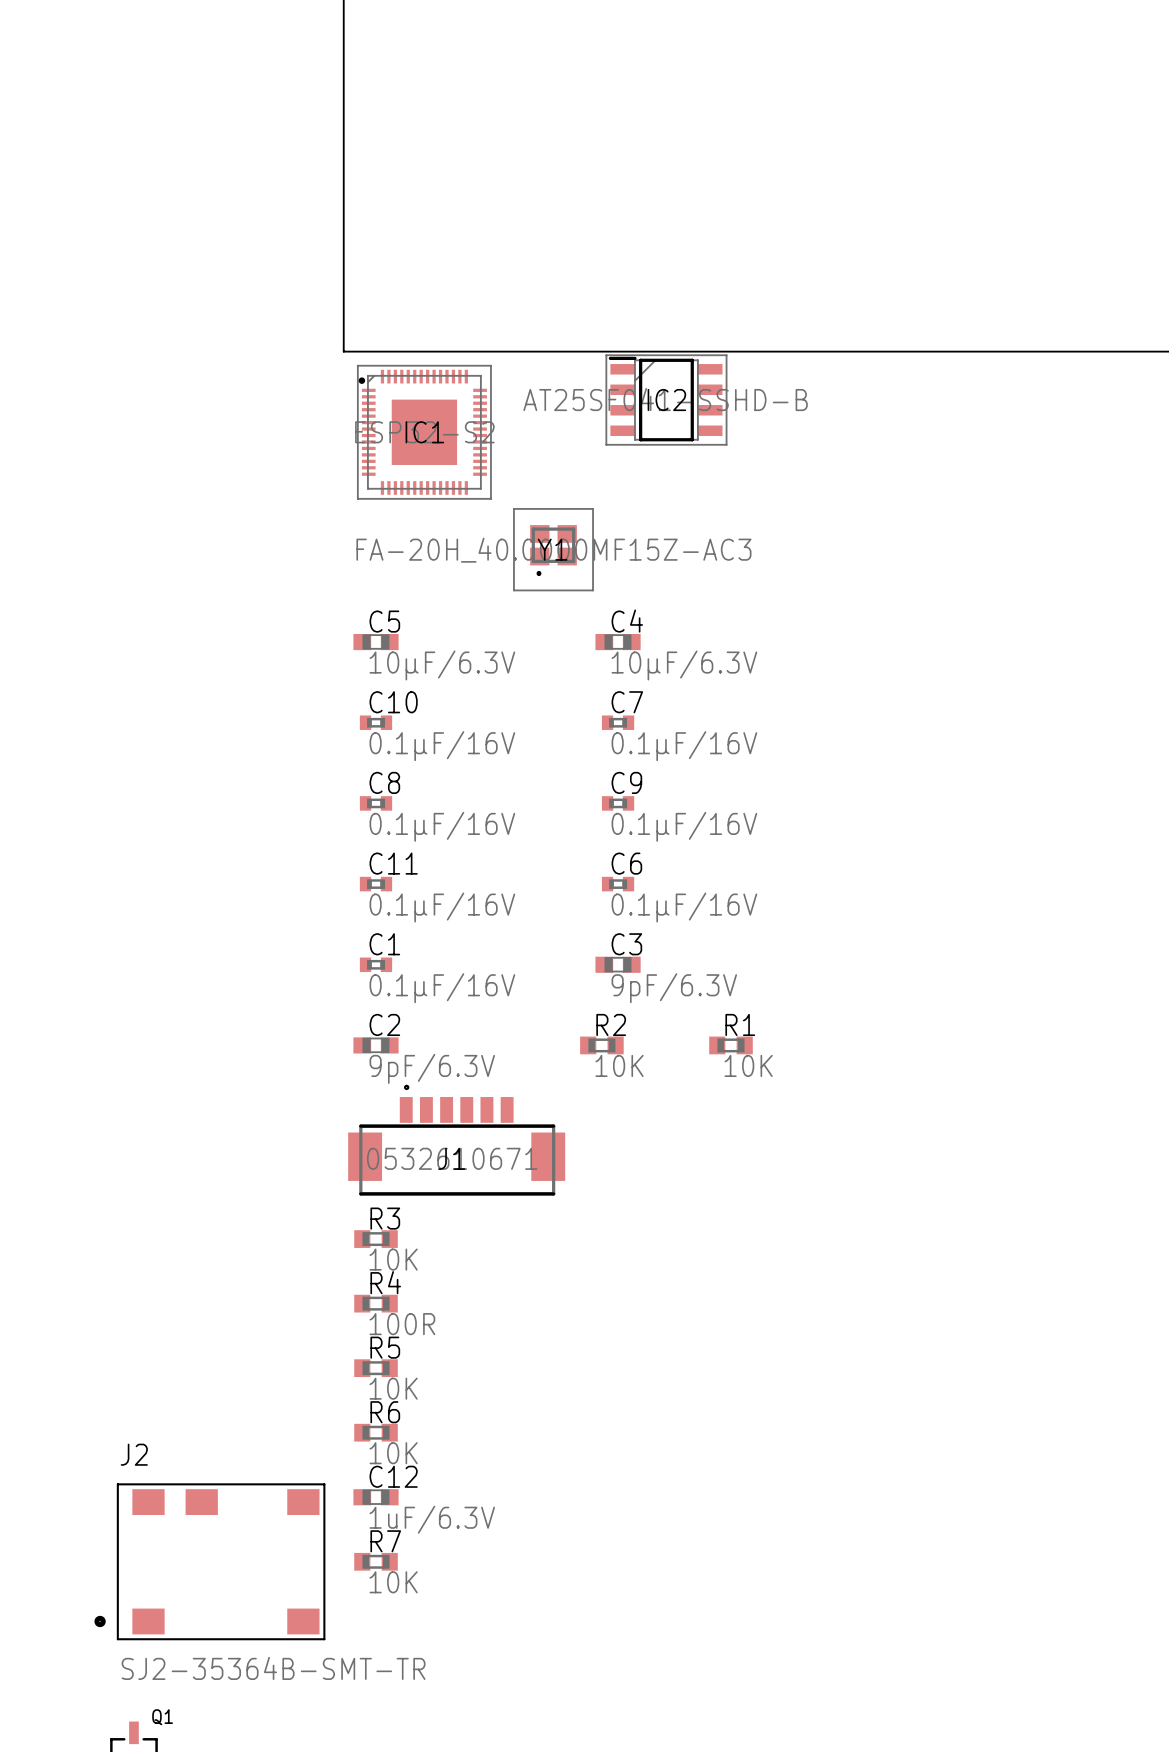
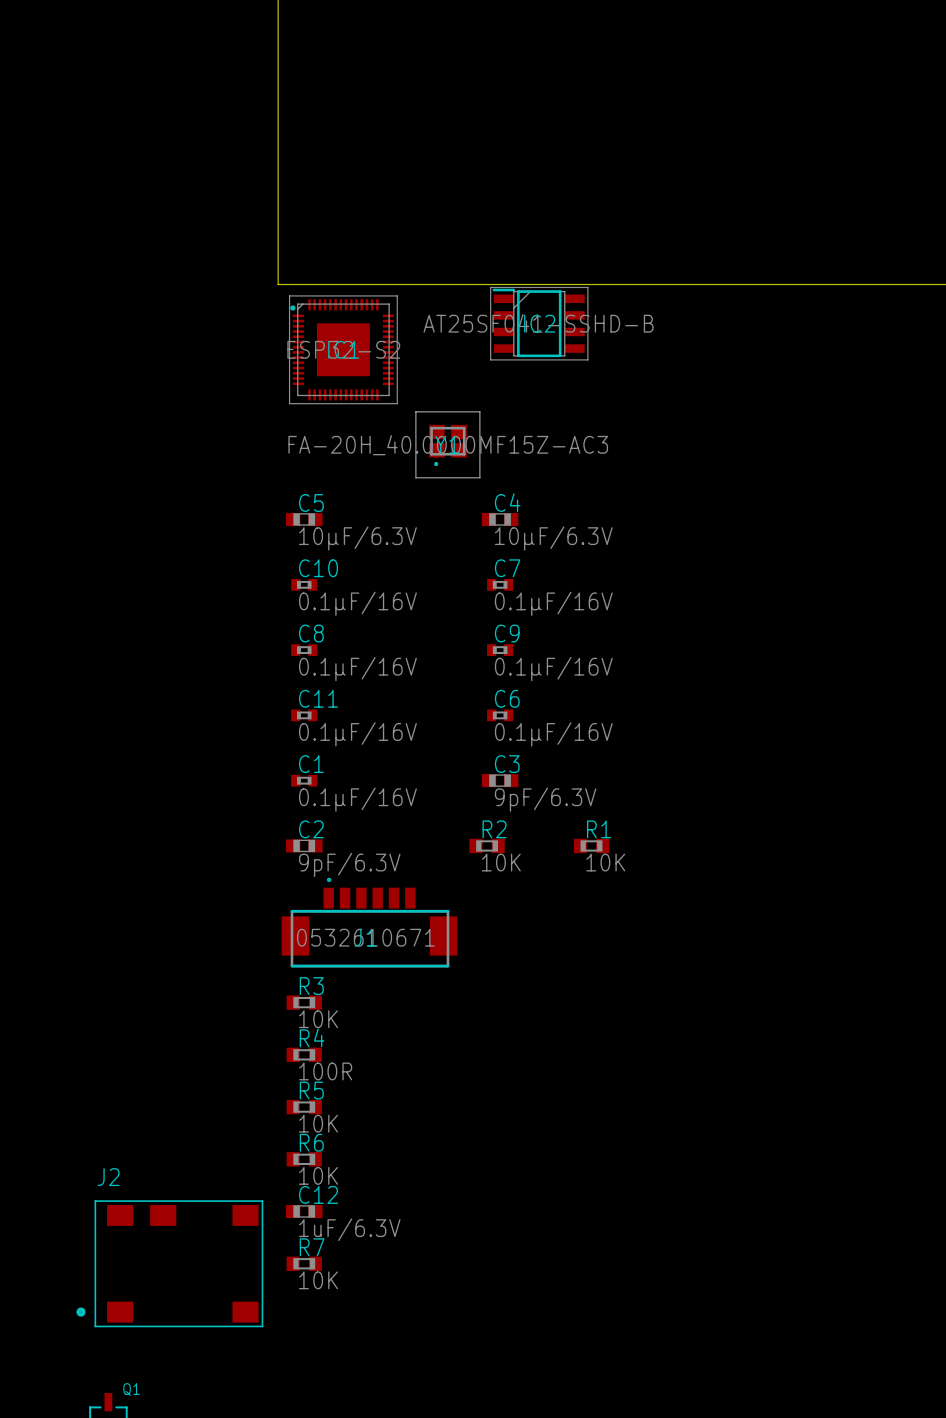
J2 value: SJ2-35364B-SMT-TR (273, 1668) -> none

